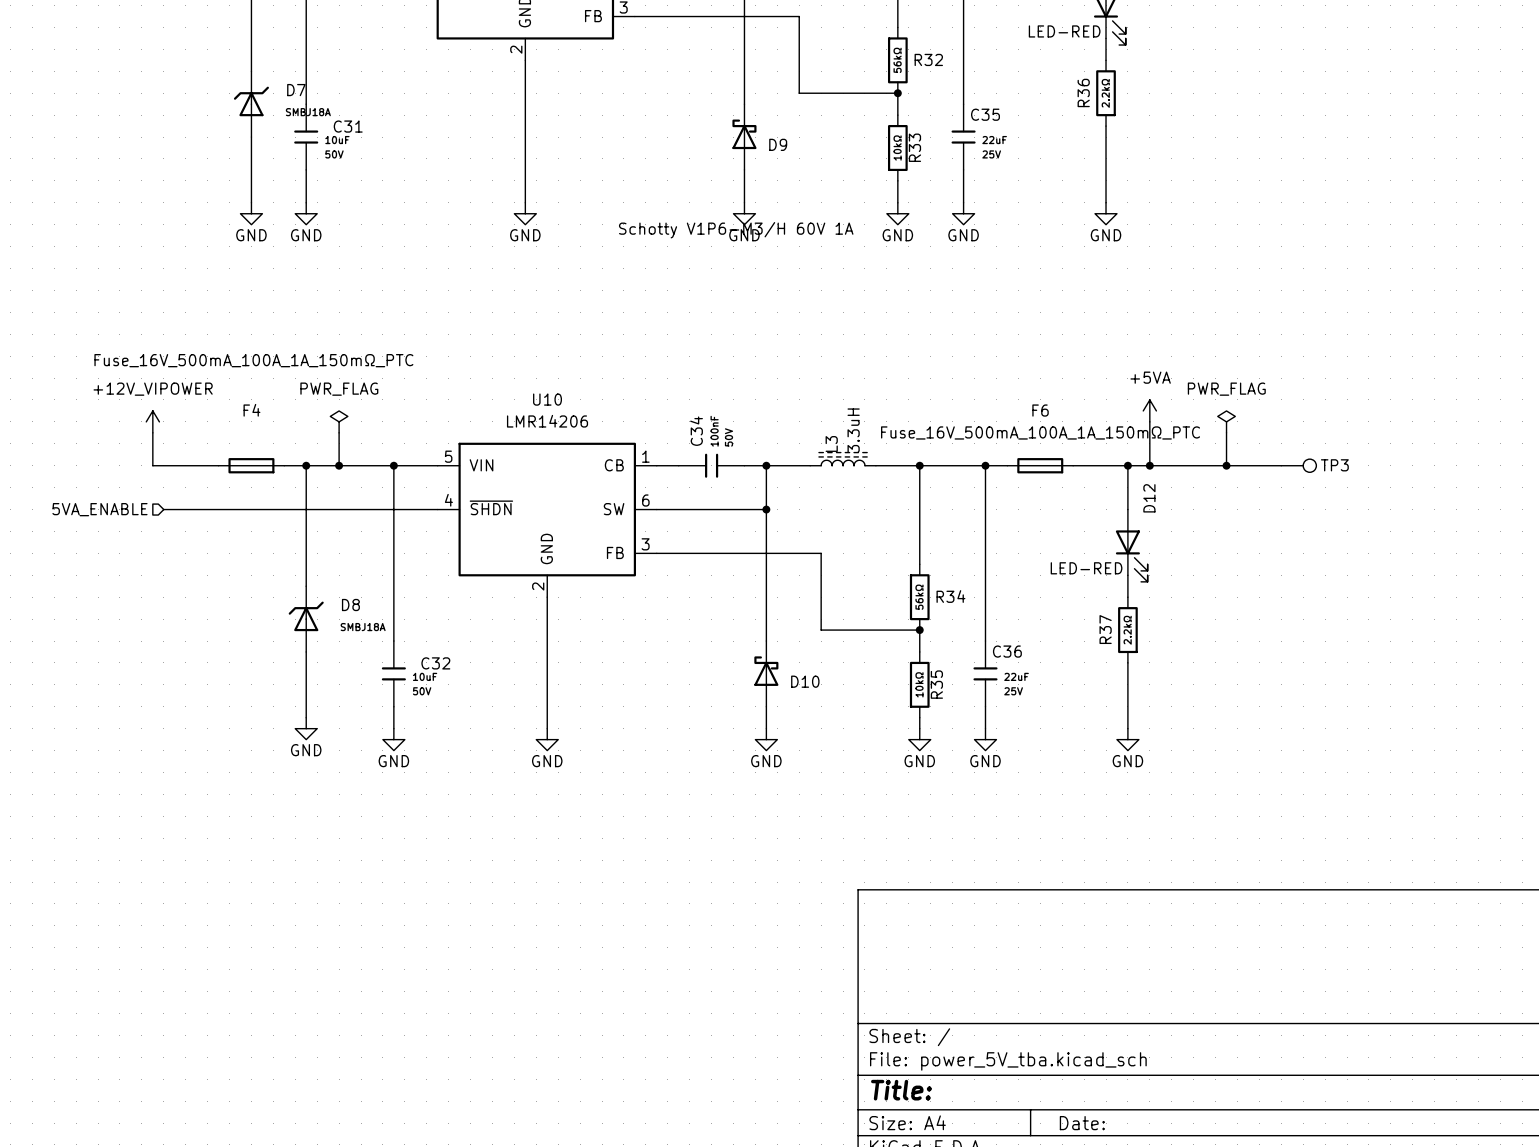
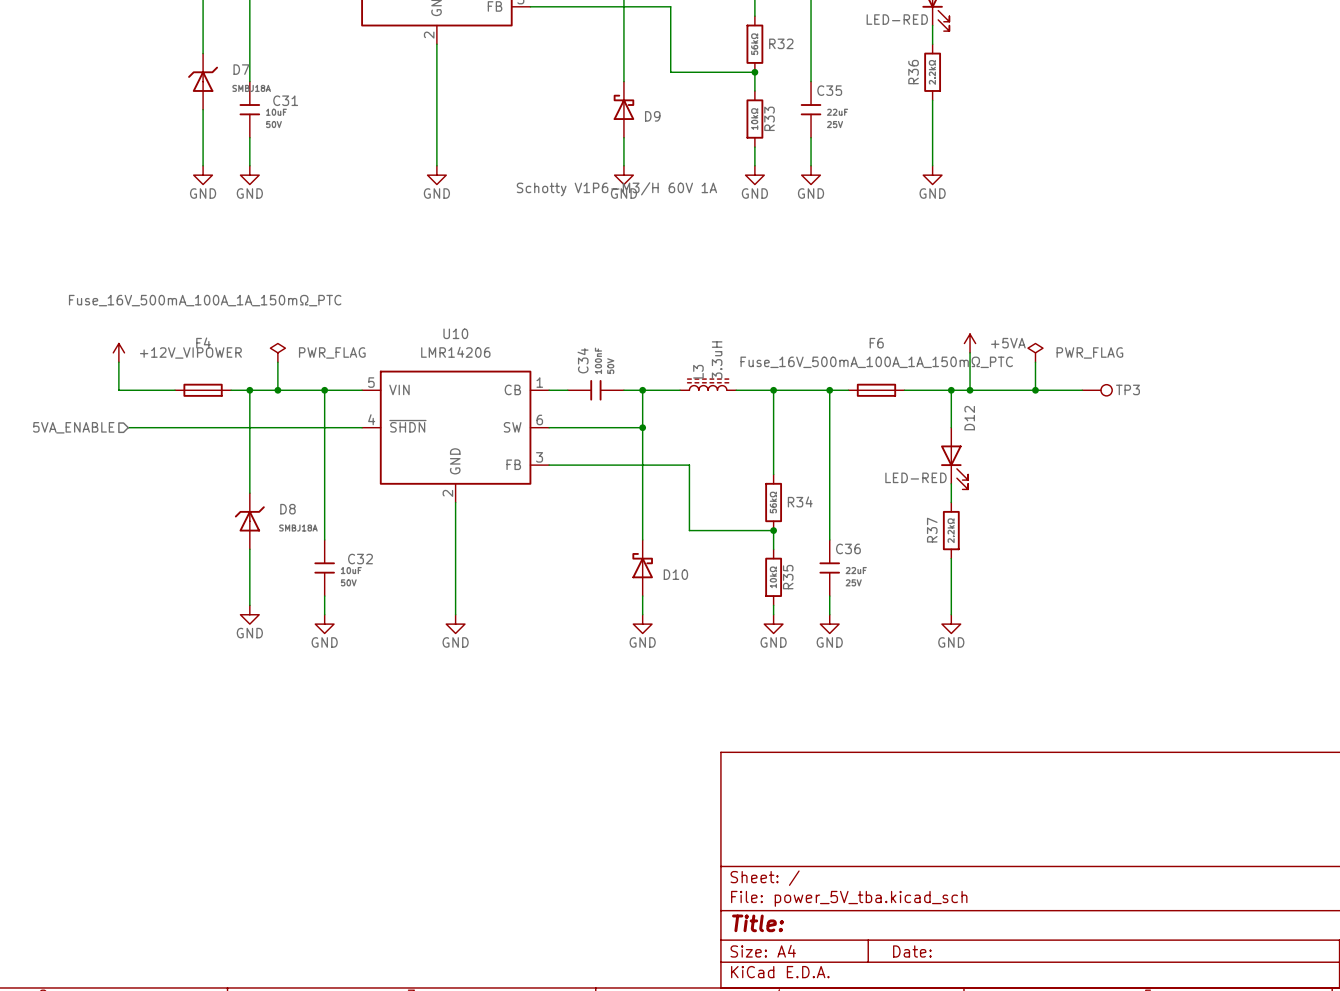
power symbol text position: +5VA (1150, 377) -> +5VA (1008, 343)
power symbol text position: +12V_VIPOWER (153, 389) -> +12V_VIPOWER (190, 352)
power symbol text position: PWR_FLAG (339, 389) -> PWR_FLAG (332, 352)
power symbol text position: PWR_FLAG (1226, 389) -> PWR_FLAG (1089, 352)

